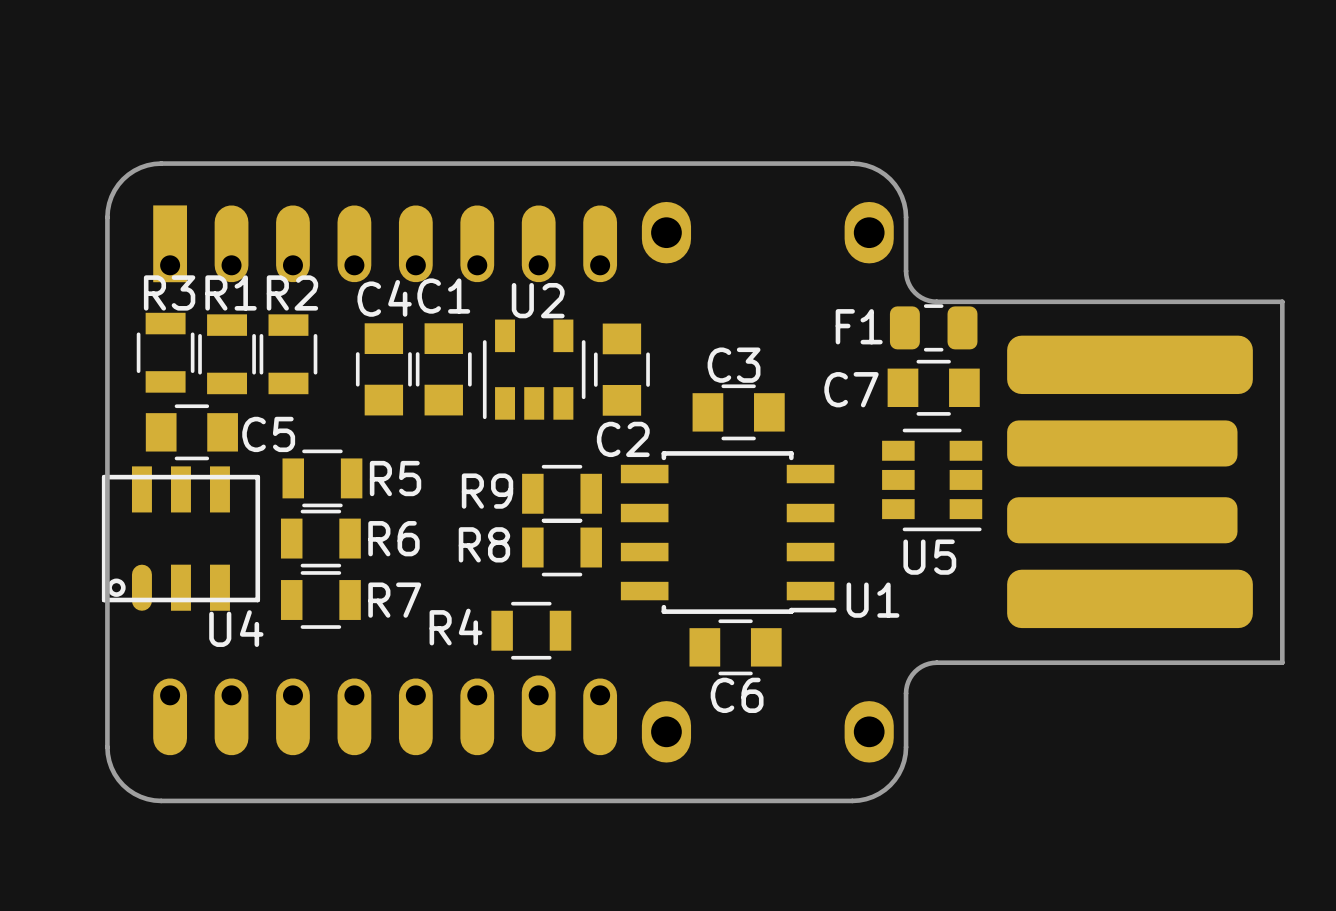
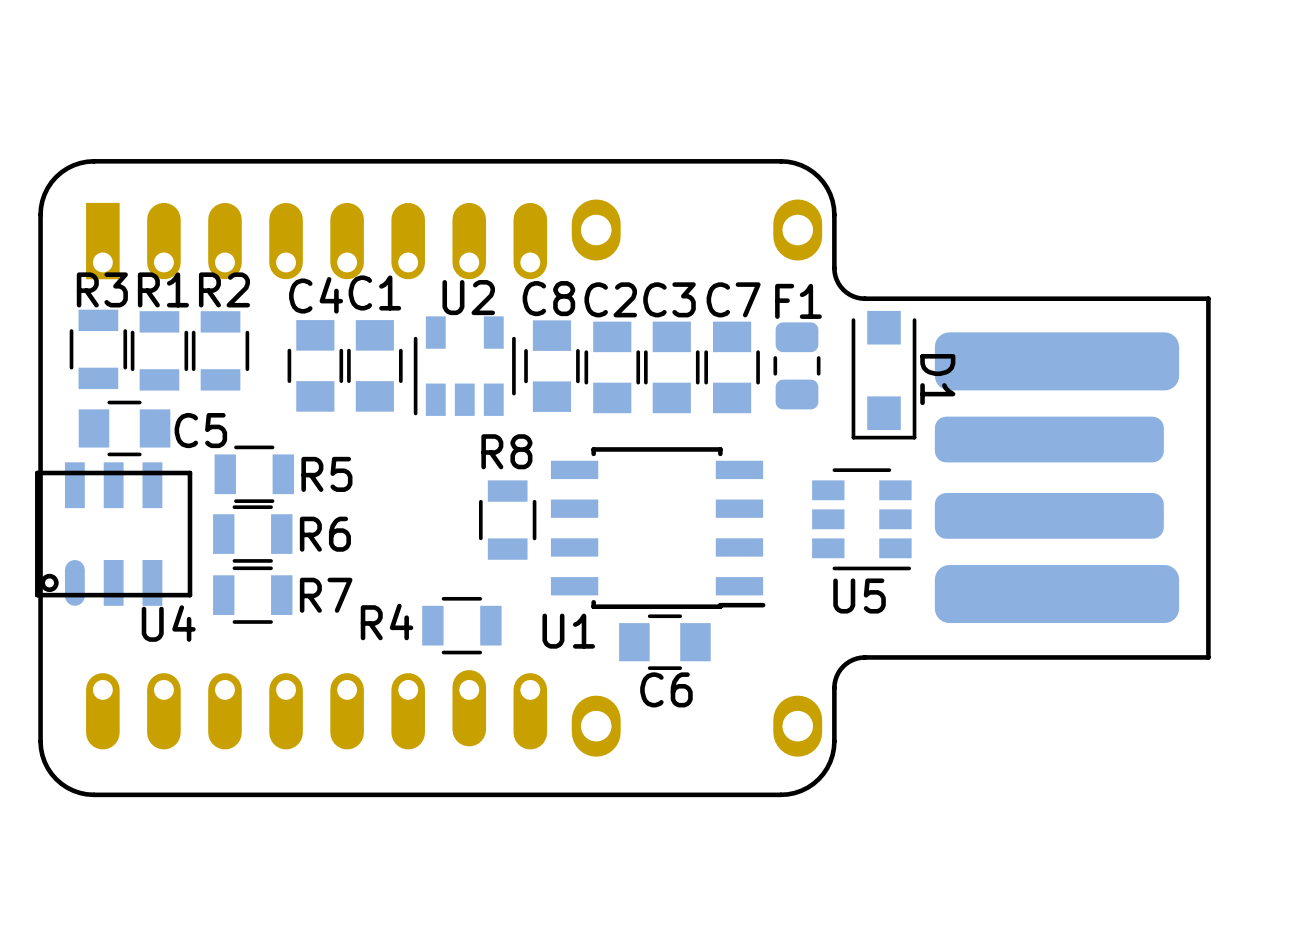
F1 rotation: 0° (933, 327) -> 90° clockwise (796, 365)
F1 position: (933, 327) -> (796, 365)
C2: none -> (612, 367)
D1: none -> (883, 375)
C7 rotation: 0° (933, 387) -> 90° clockwise (732, 367)
C7 position: (933, 387) -> (732, 367)
C3 rotation: 0° (738, 412) -> 90° clockwise (671, 367)
C2 name: C2 (623, 439) -> C8 (548, 298)
U5 position: (932, 479) -> (861, 519)
R9: (562, 493) -> none
R8 rotation: 0° (562, 547) -> 90° clockwise (507, 520)
U1 name position: U1 (872, 600) -> U1 (568, 631)

